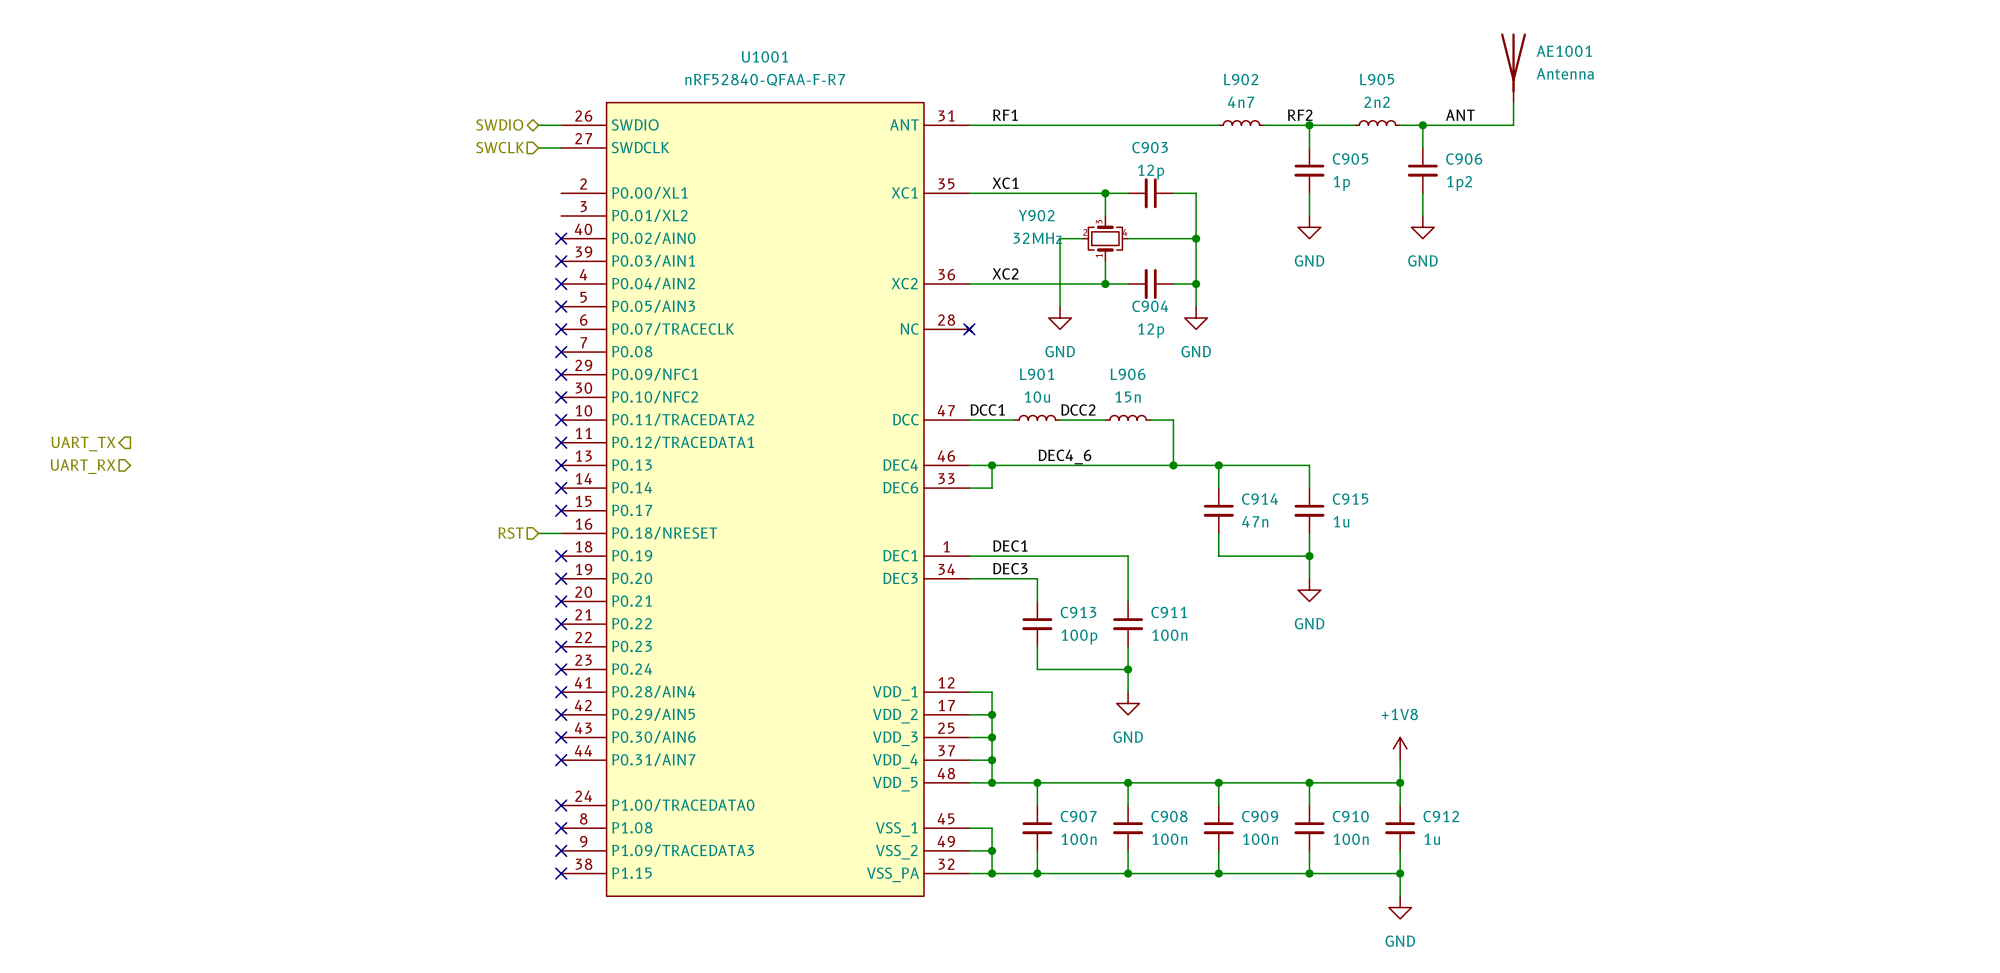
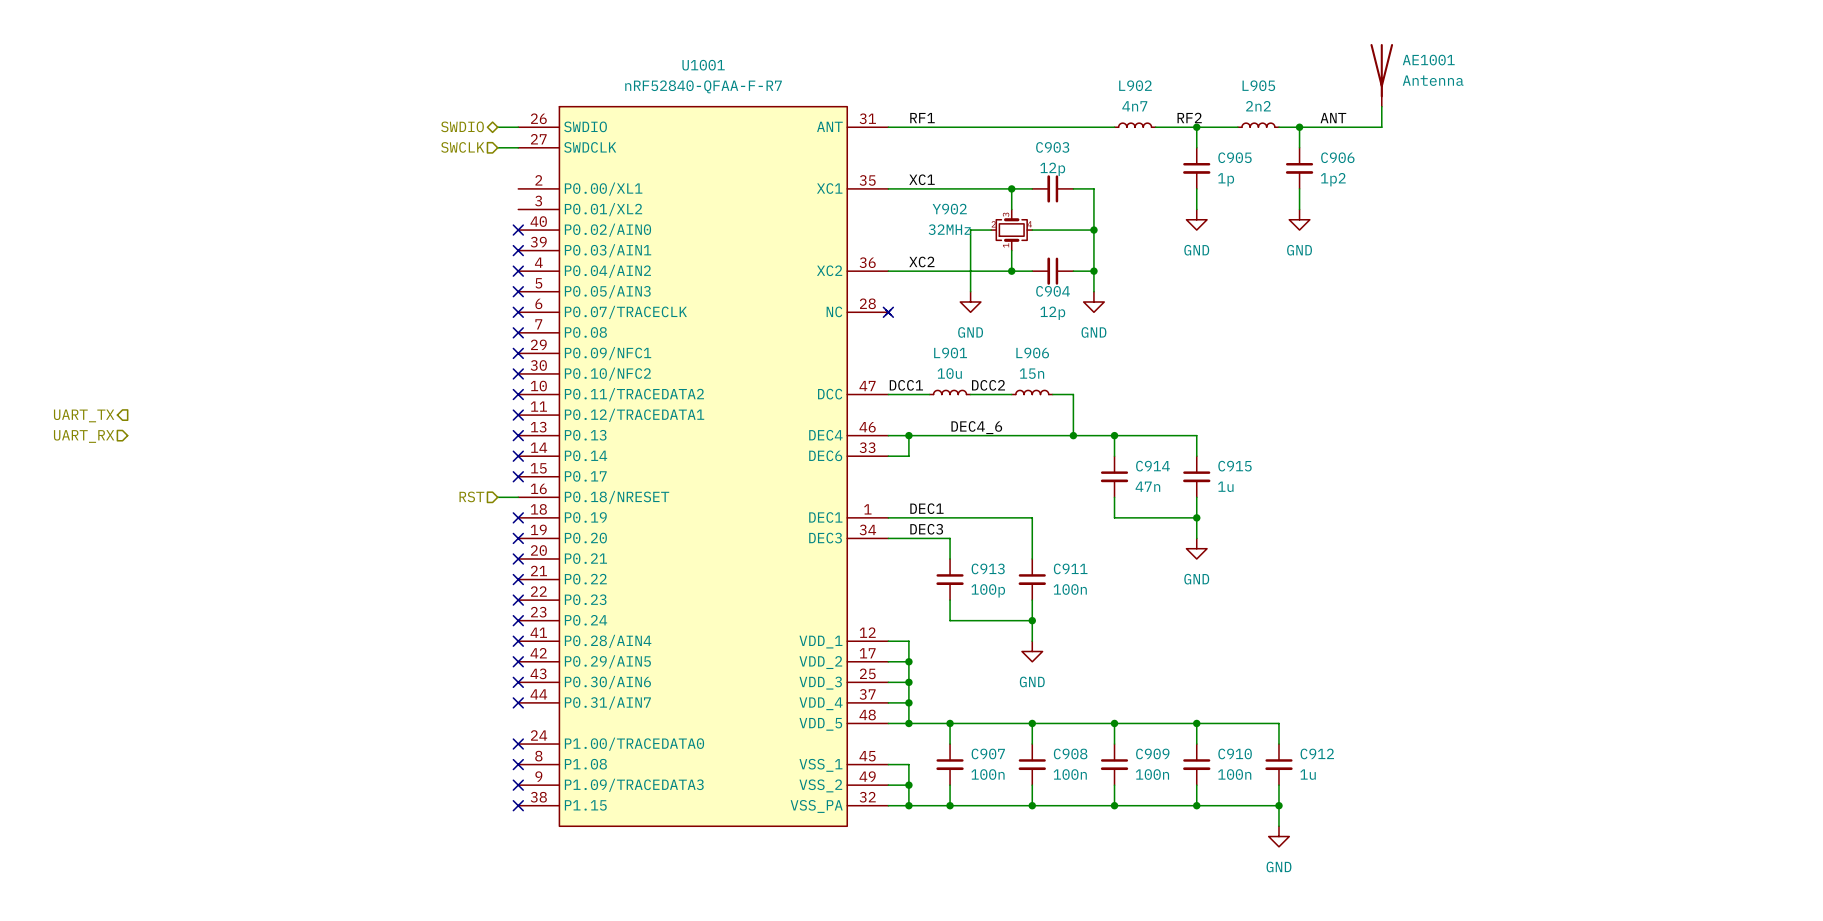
power symbol: +1V8 (1400, 748) -> none
wire: (1400, 760) (1400, 782) -> none
junction: (1400, 782) -> none

